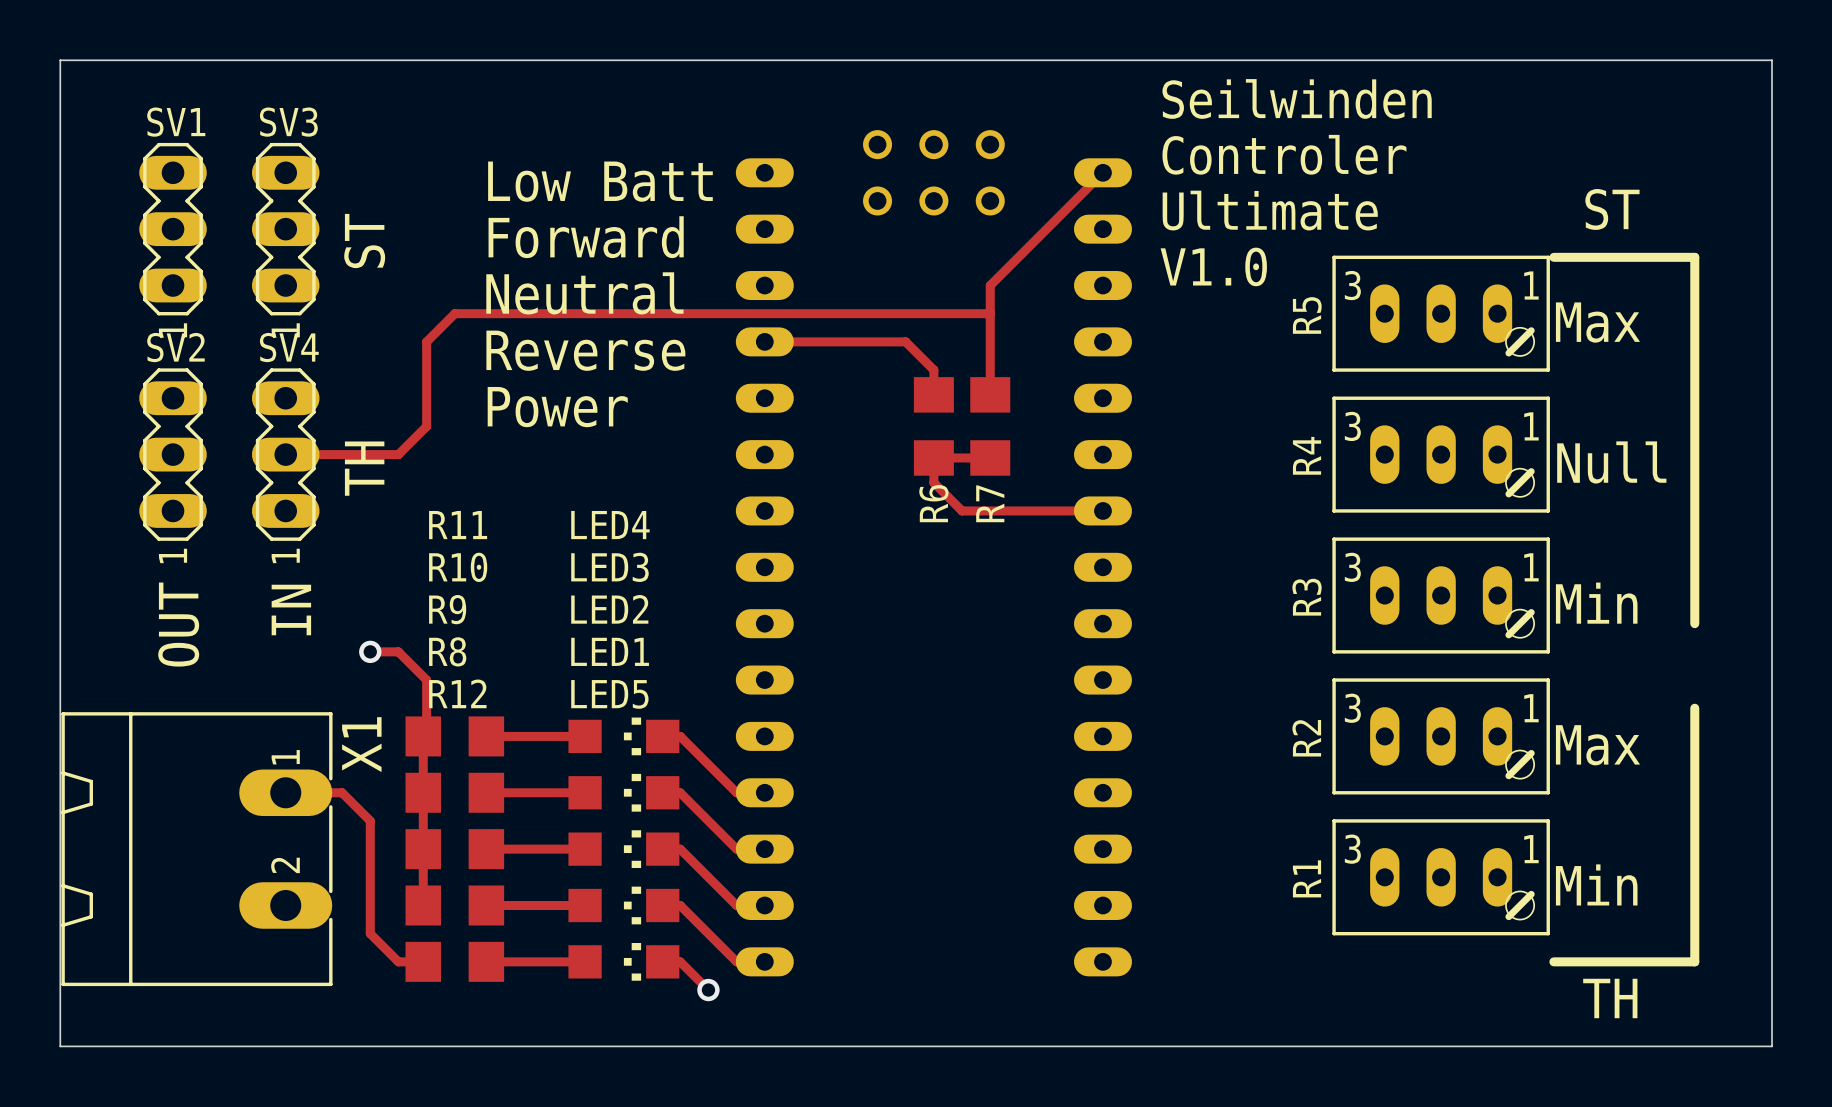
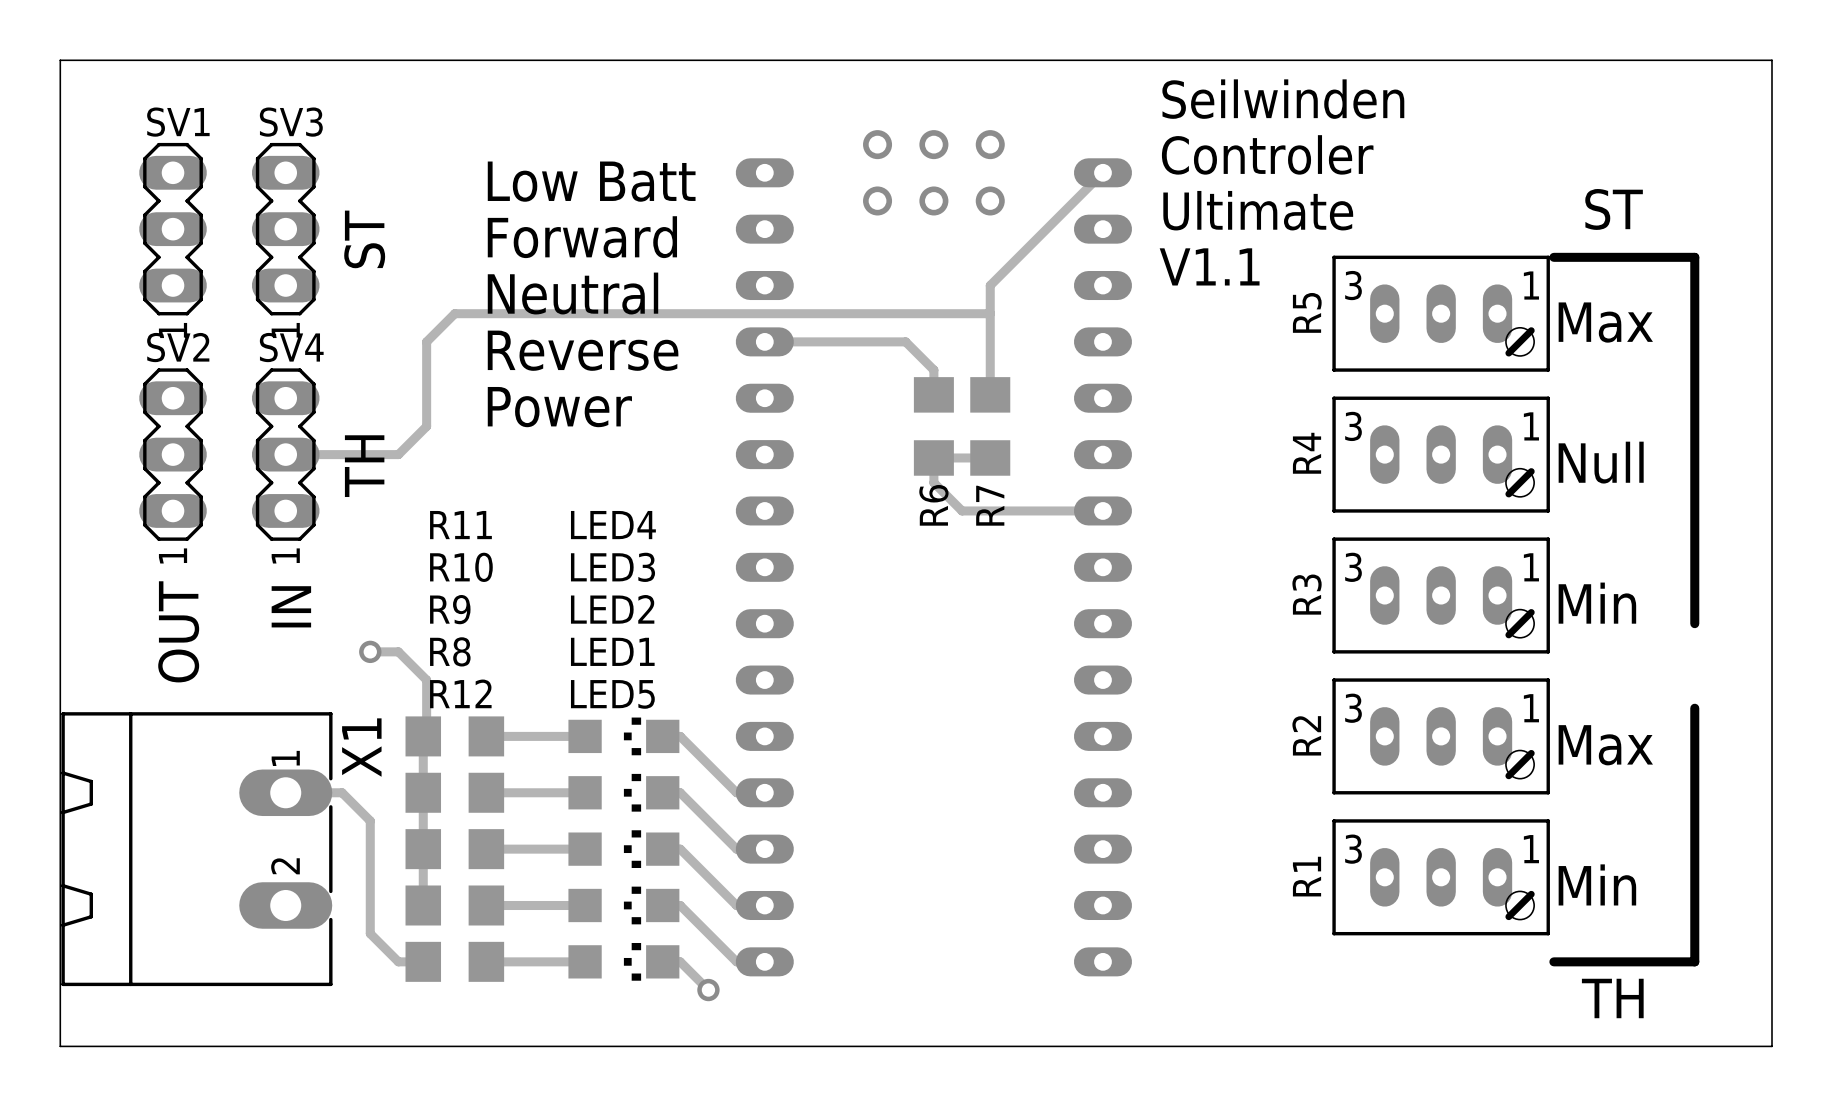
text: V1.0 (1213, 266) -> V1.1 (1209, 266)

